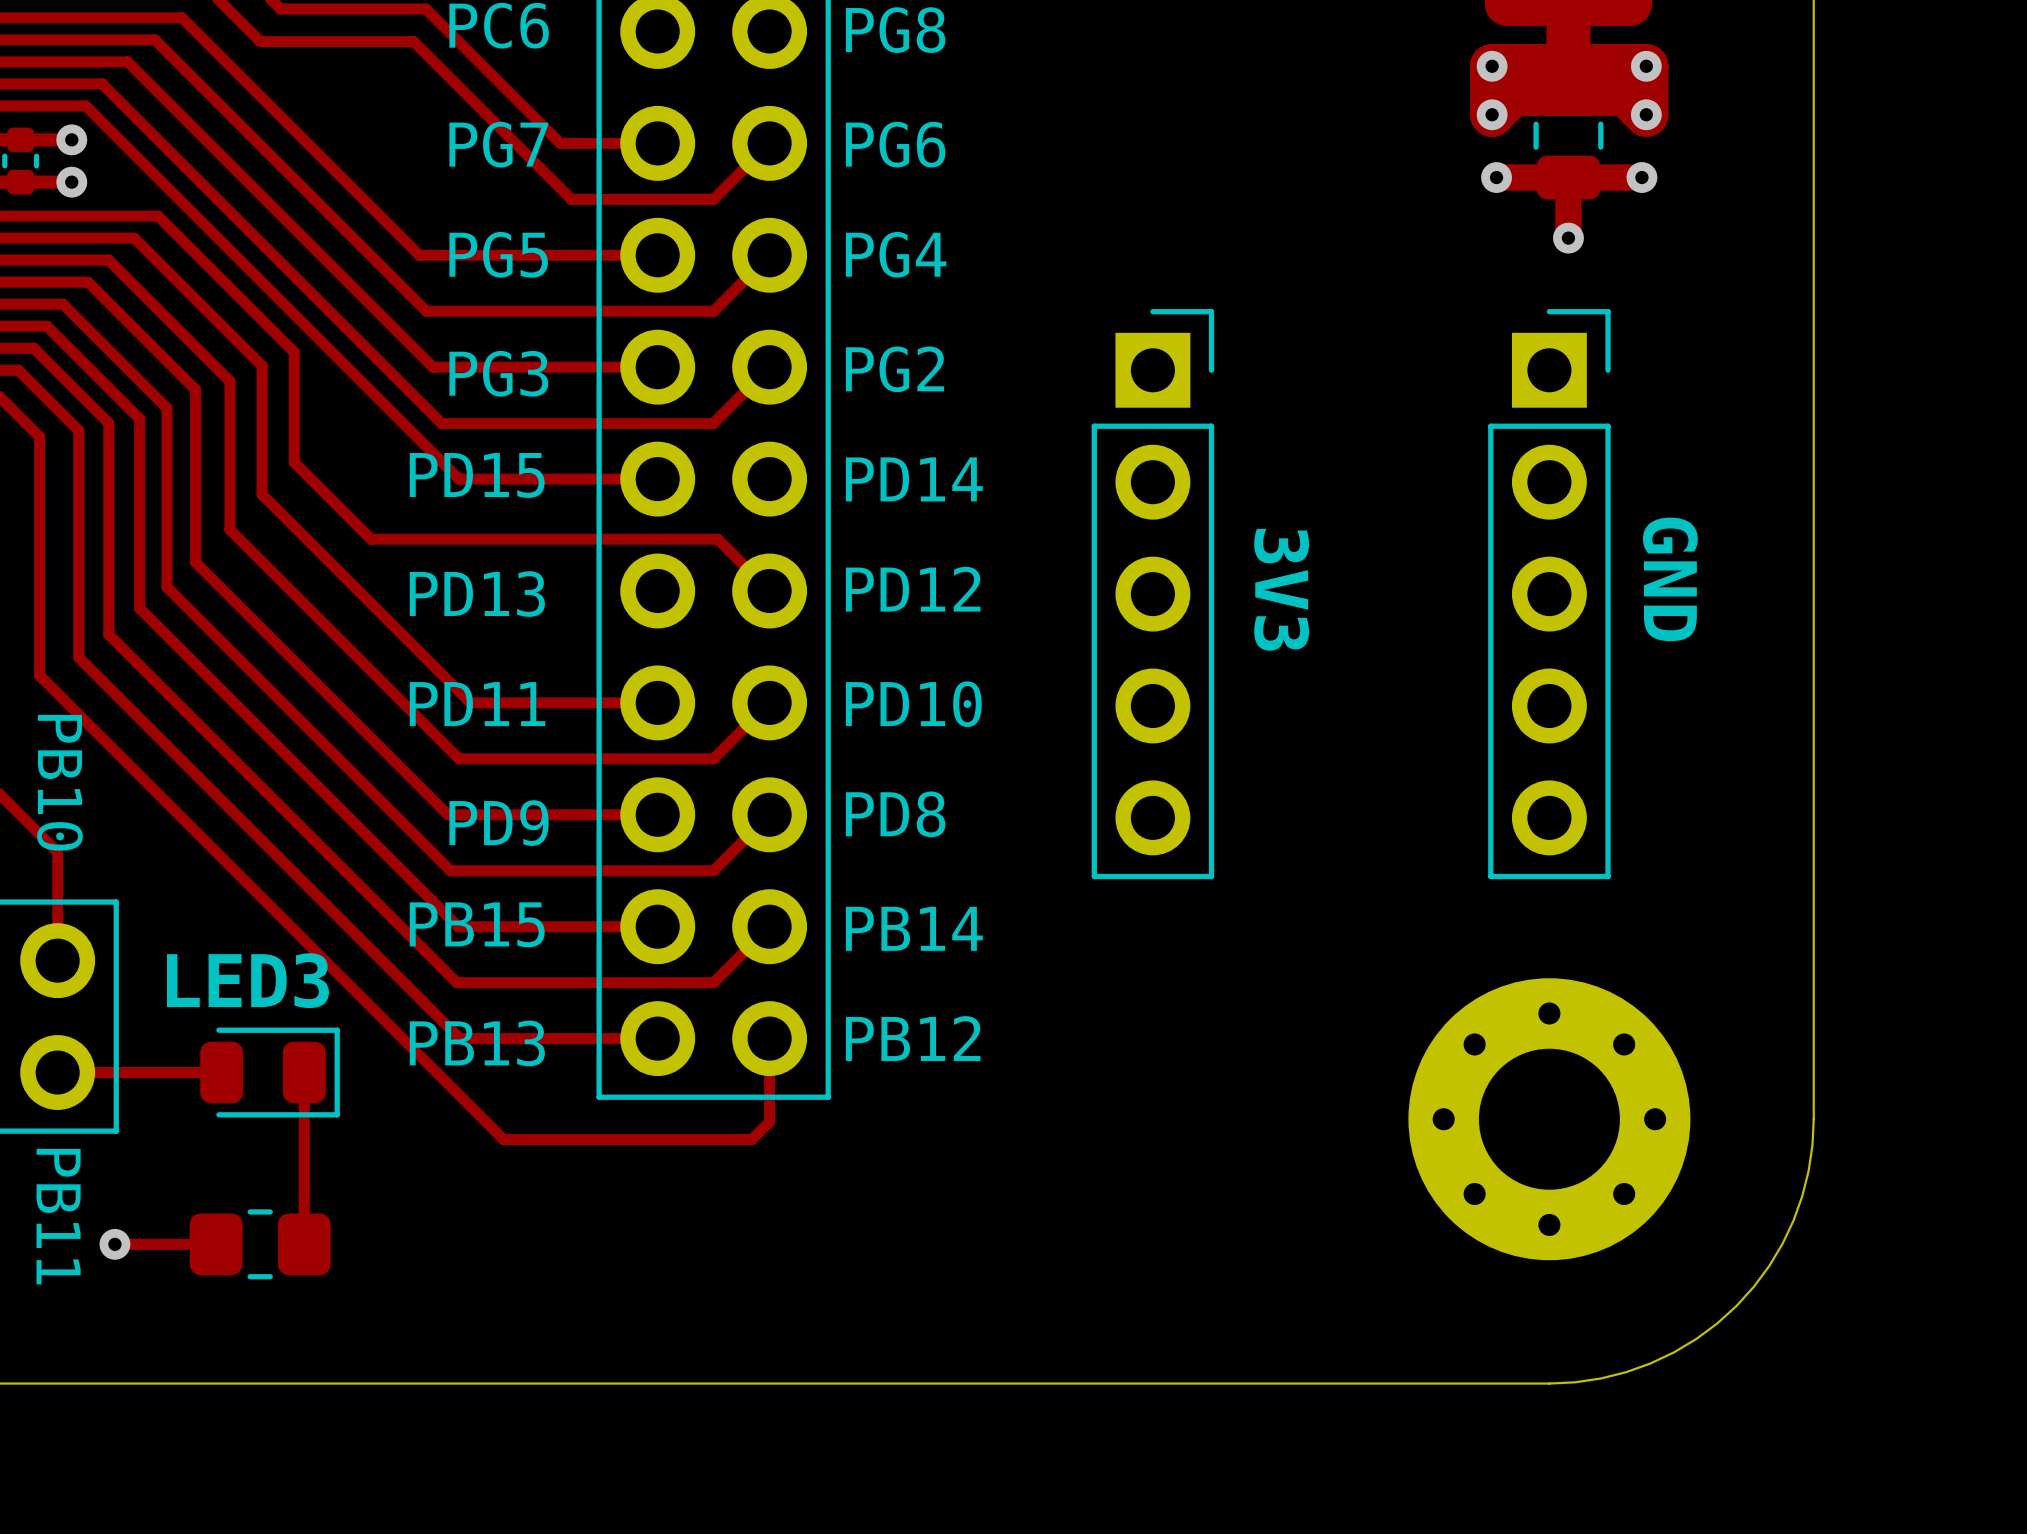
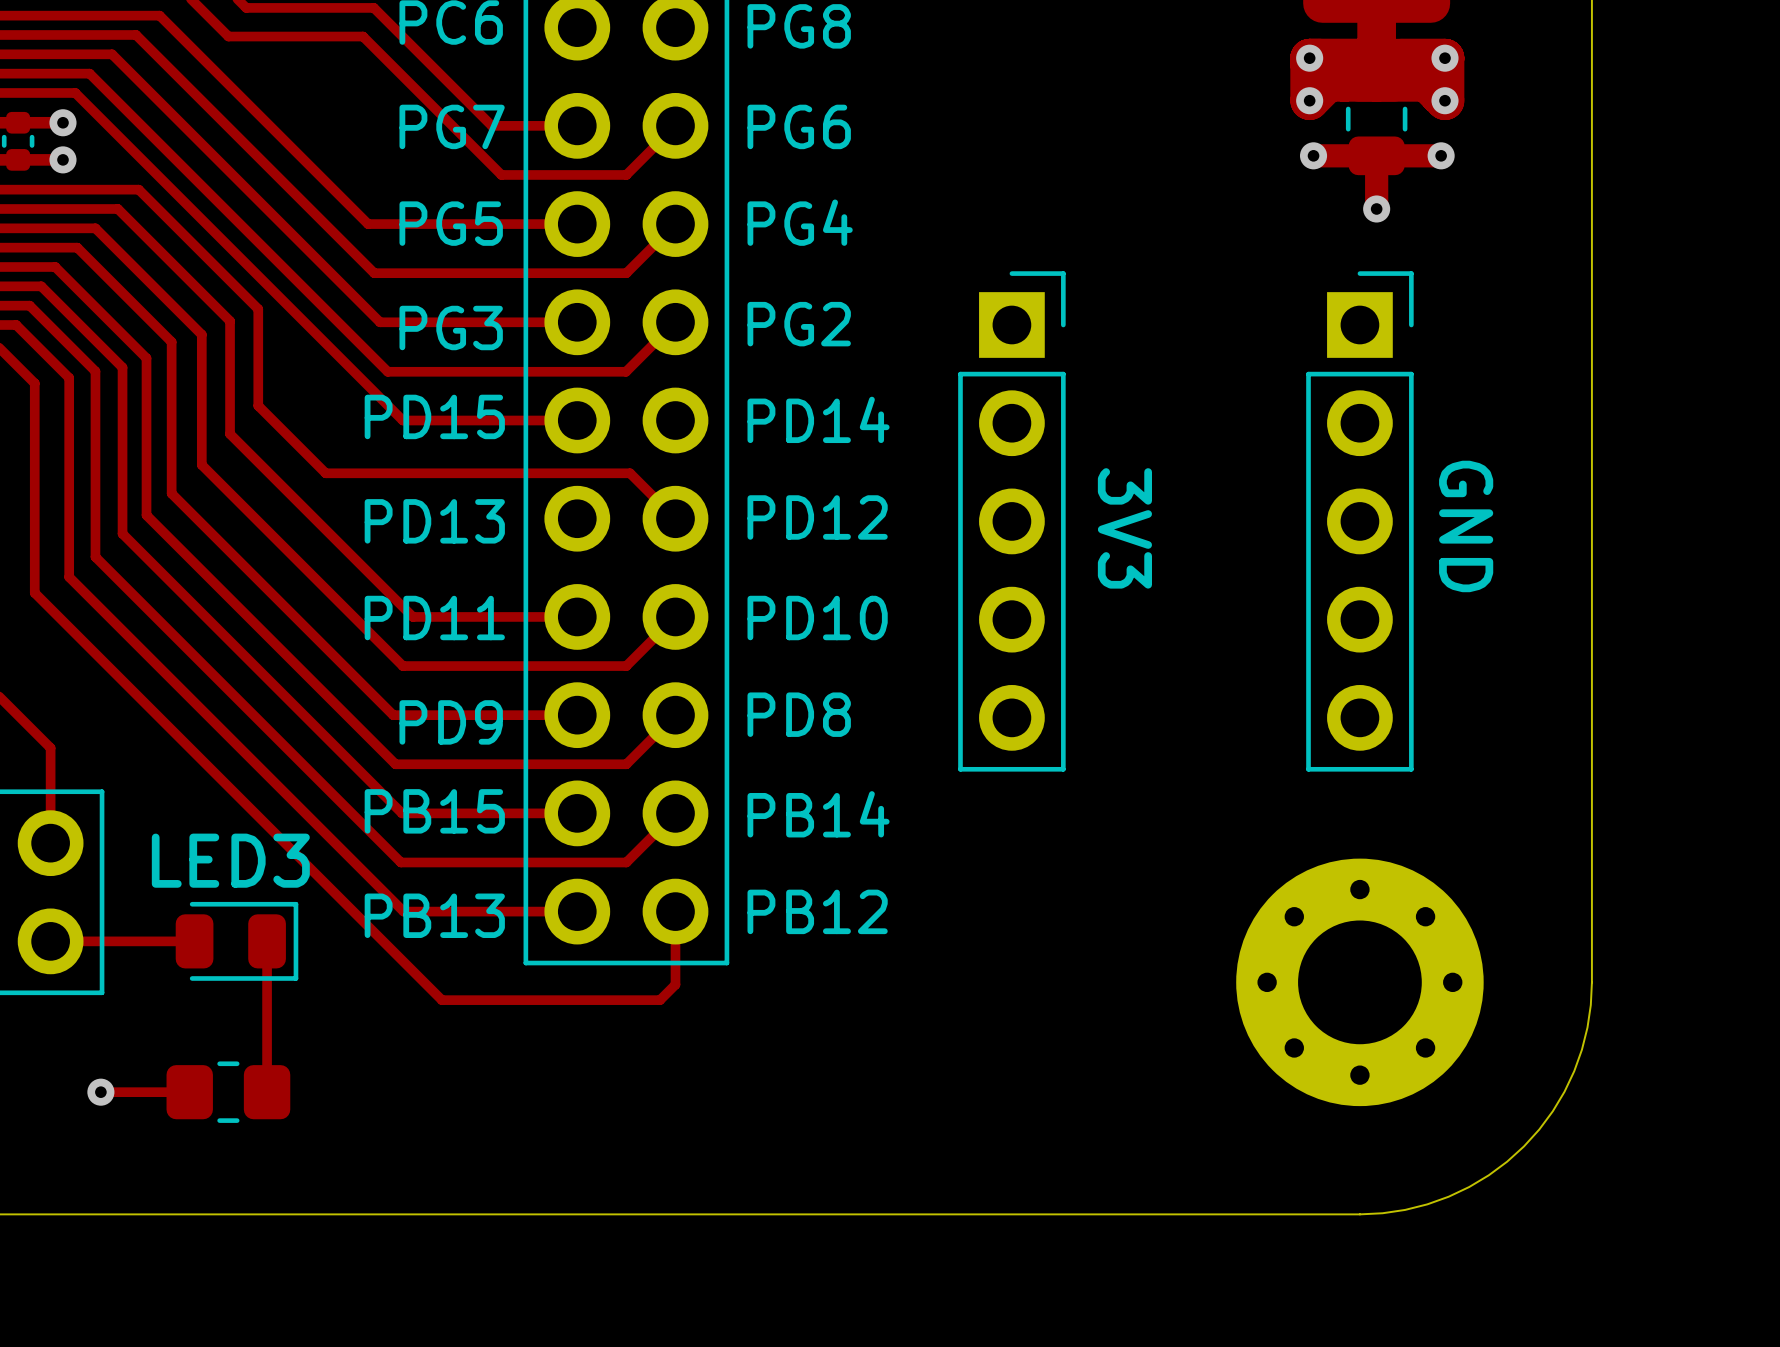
text: PB10 (59, 782) -> none
text: PB11 (58, 1216) -> none

